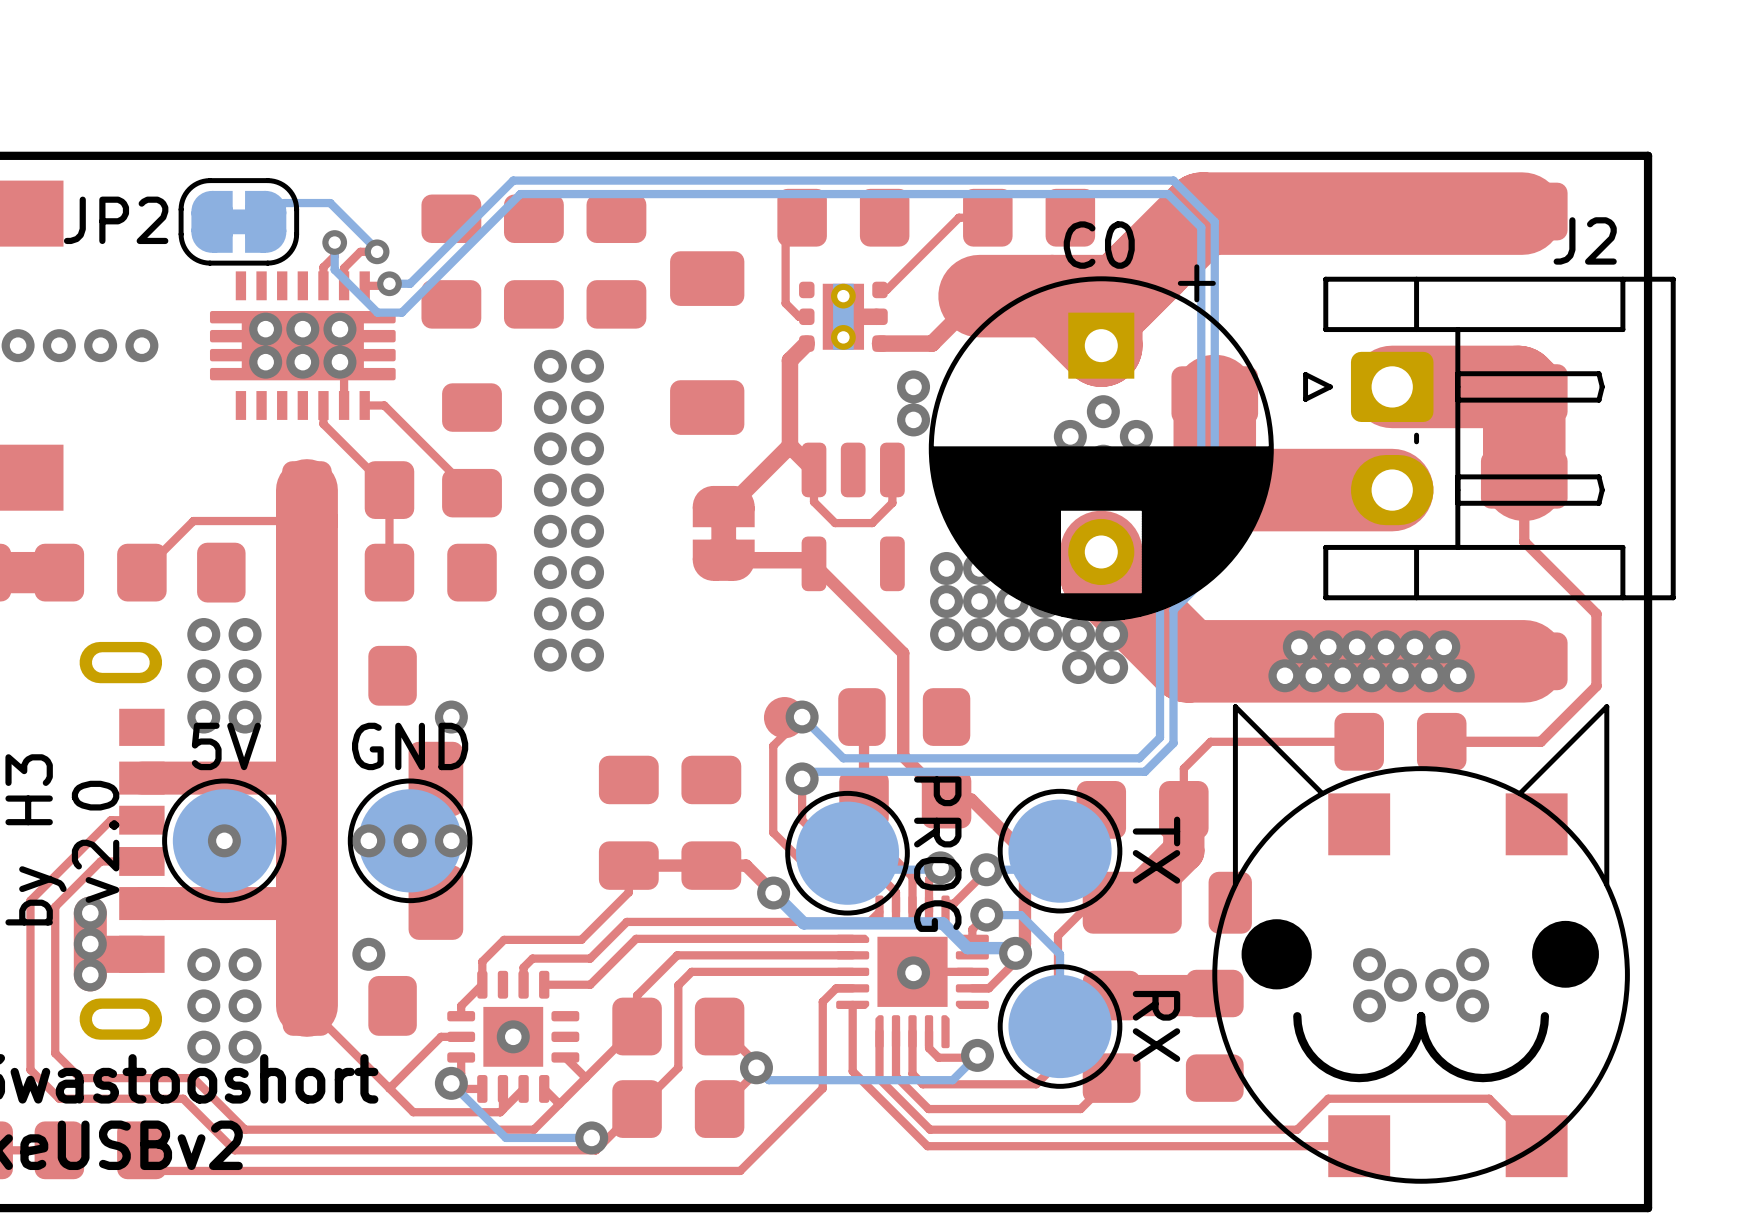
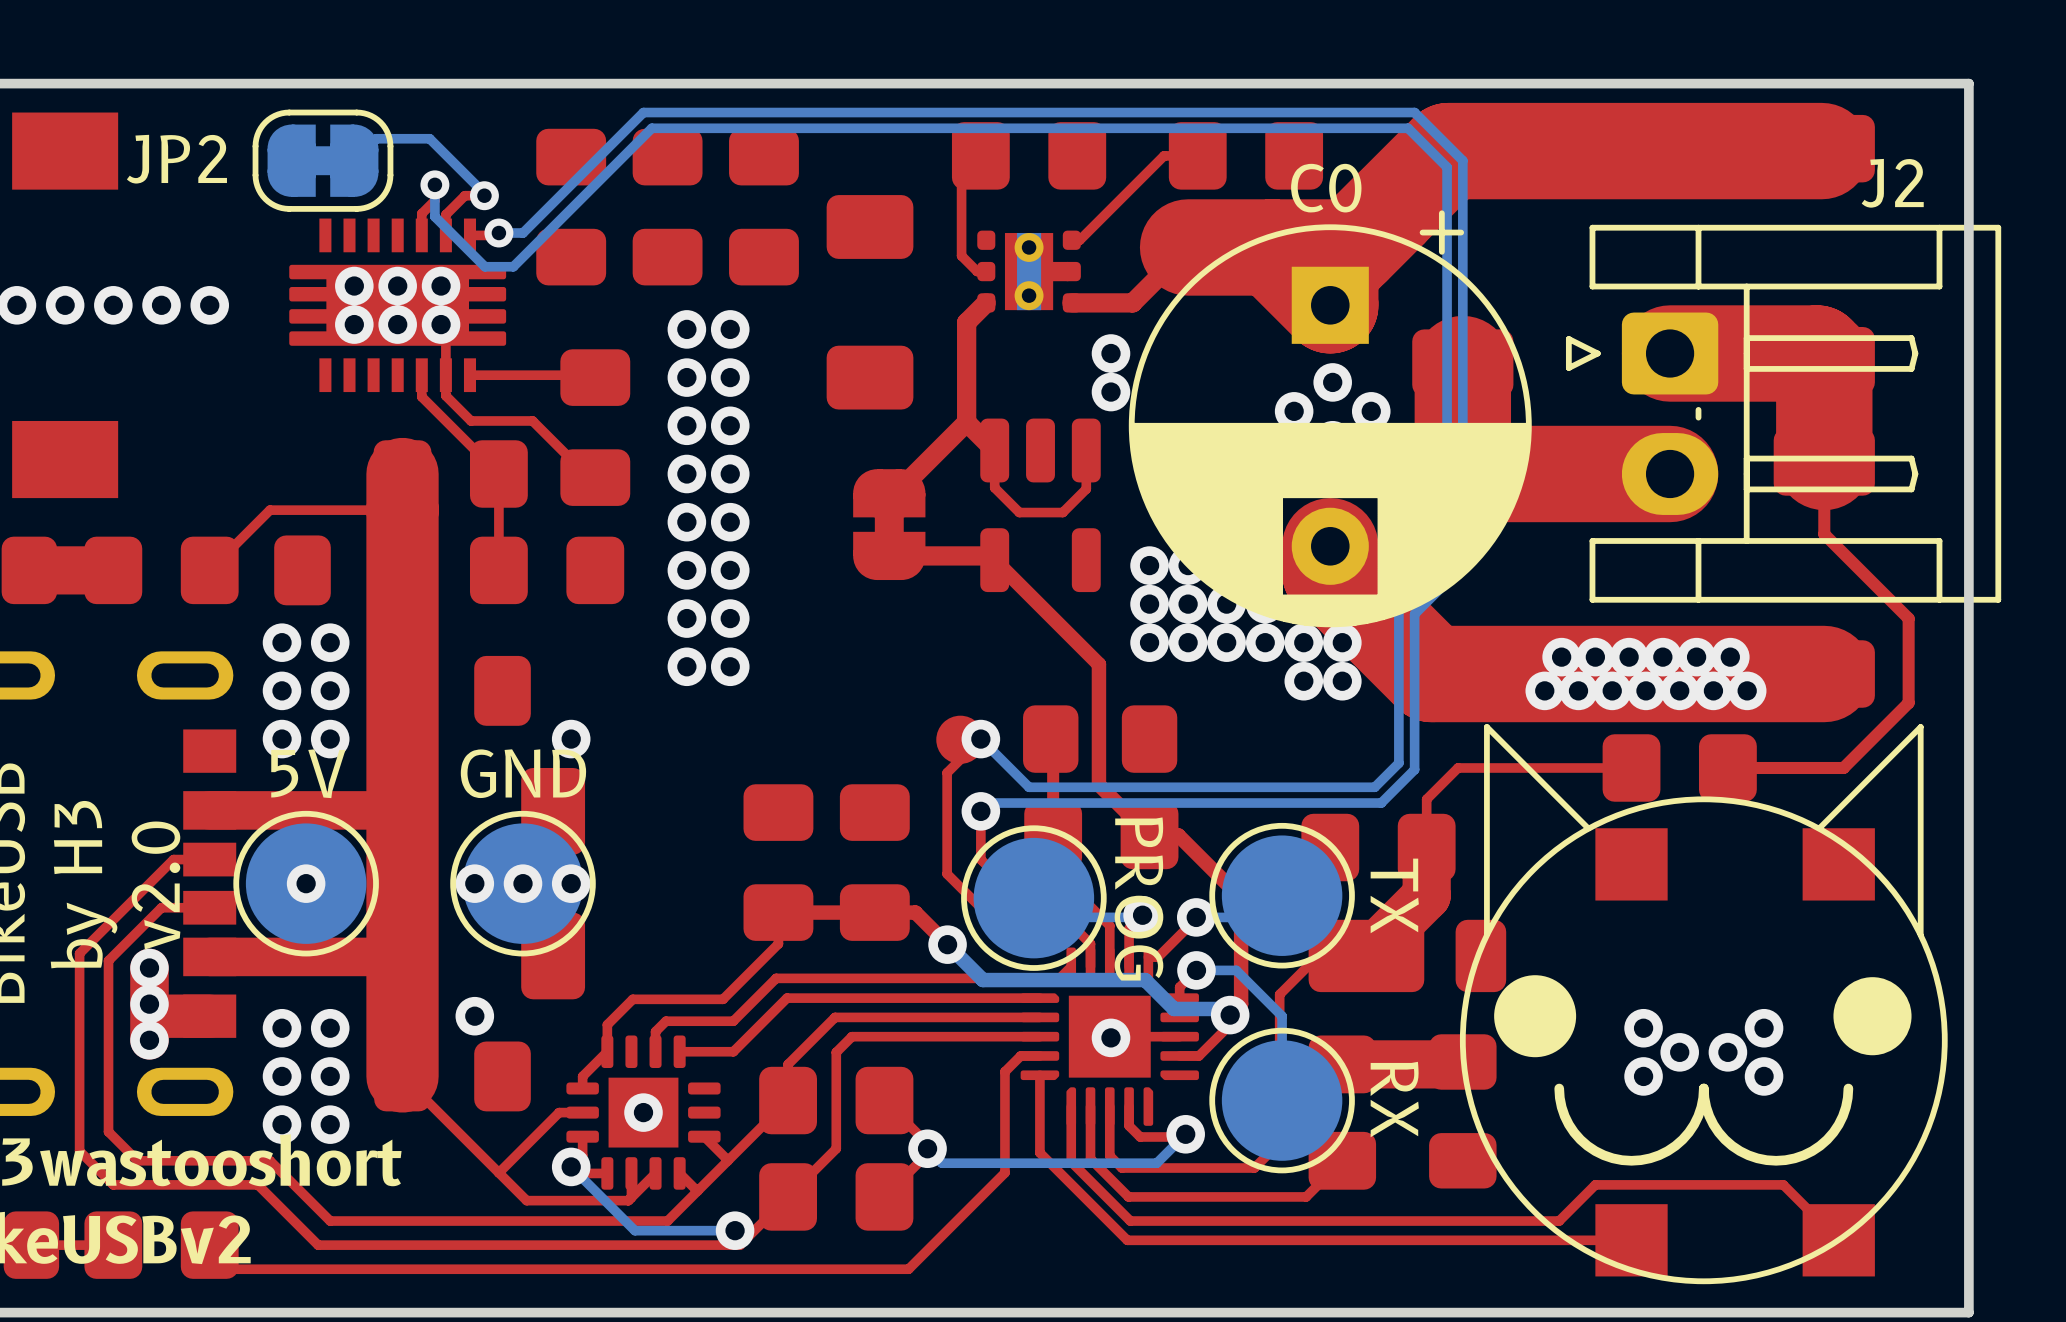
top track: none -> (445, 375) (445, 395) (471, 420) (532, 420) (590, 478)
top track: (384, 405) (472, 493) -> (492, 375) (586, 375) (590, 378)

